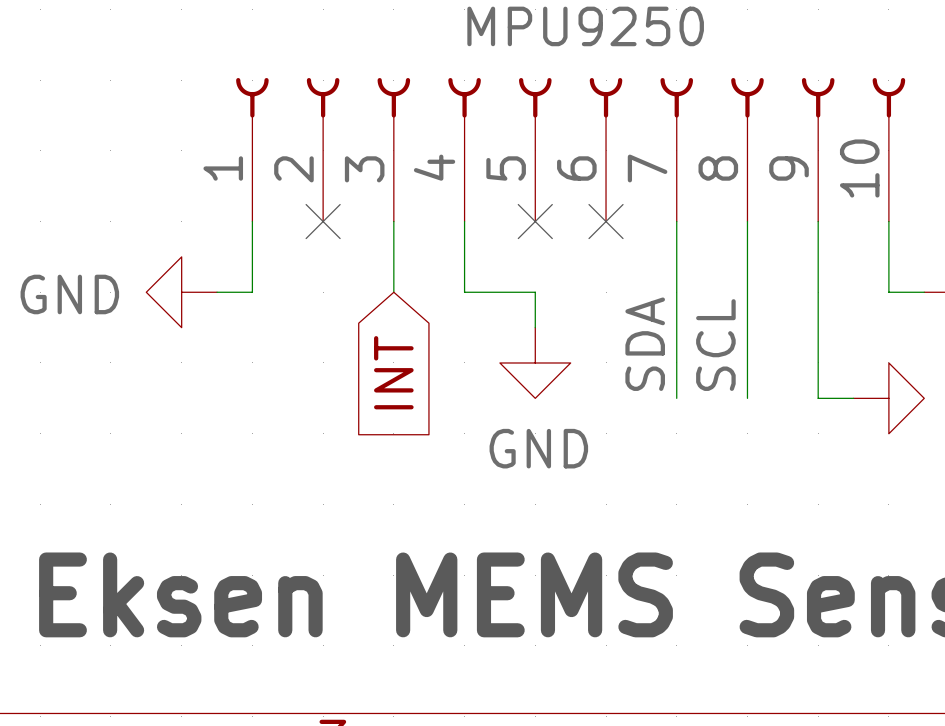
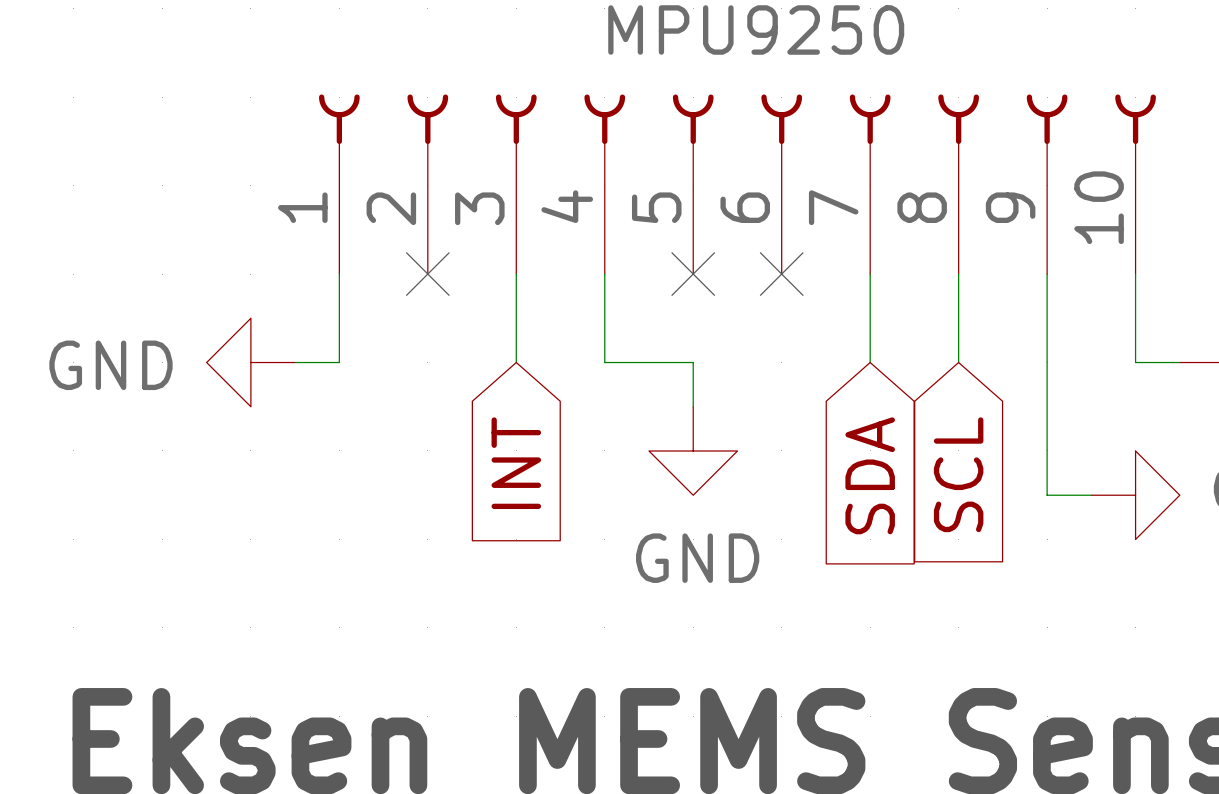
wire: (676, 292) (676, 398) -> none
wire: (747, 292) (747, 398) -> none
label: SDA (645, 344) -> none
label: SCL (715, 345) -> none
global label: none -> SCL (958, 474)
global label: none -> SDA (870, 475)

